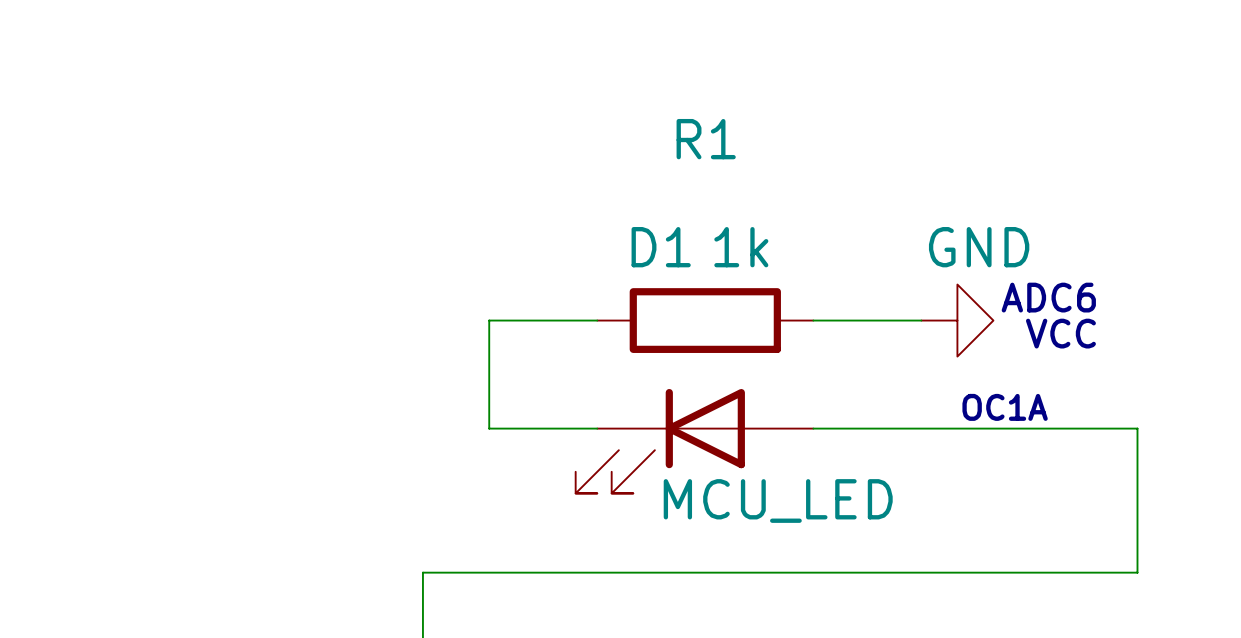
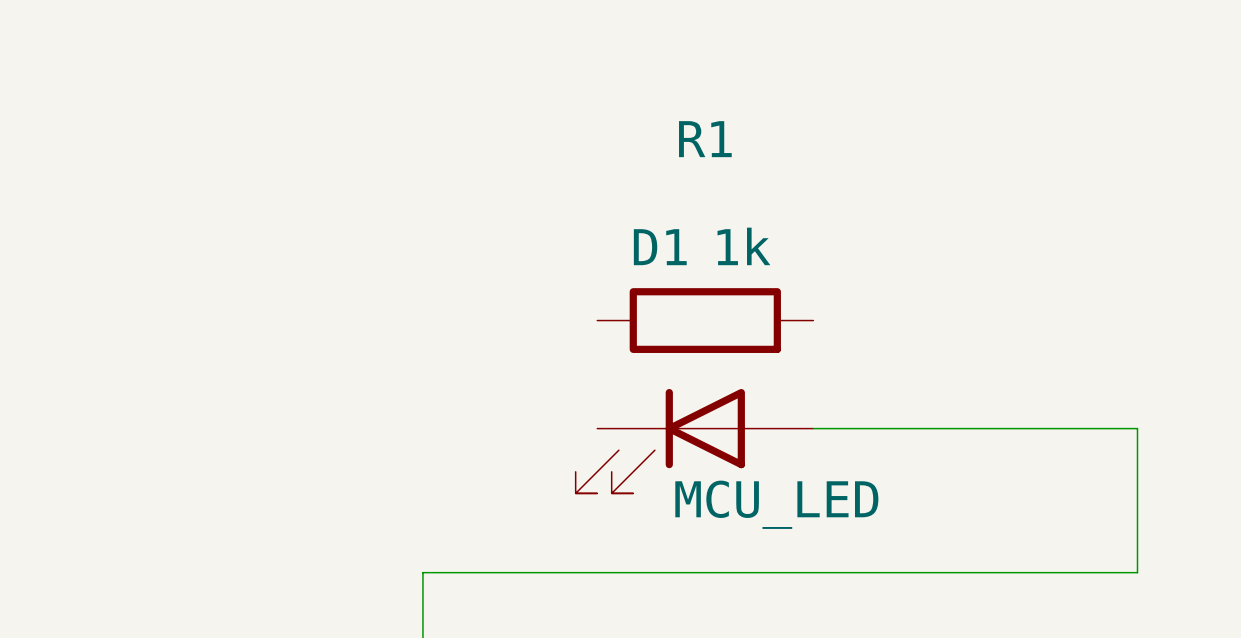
text: ADC6 (1048, 297) -> none
wire: (597, 320) (489, 320) (489, 428) (597, 428) -> none
wire: (813, 320) (921, 320) -> none
power symbol: GND (957, 320) -> none
text: VCC (1060, 333) -> none
text: OC1A (1005, 407) -> none

